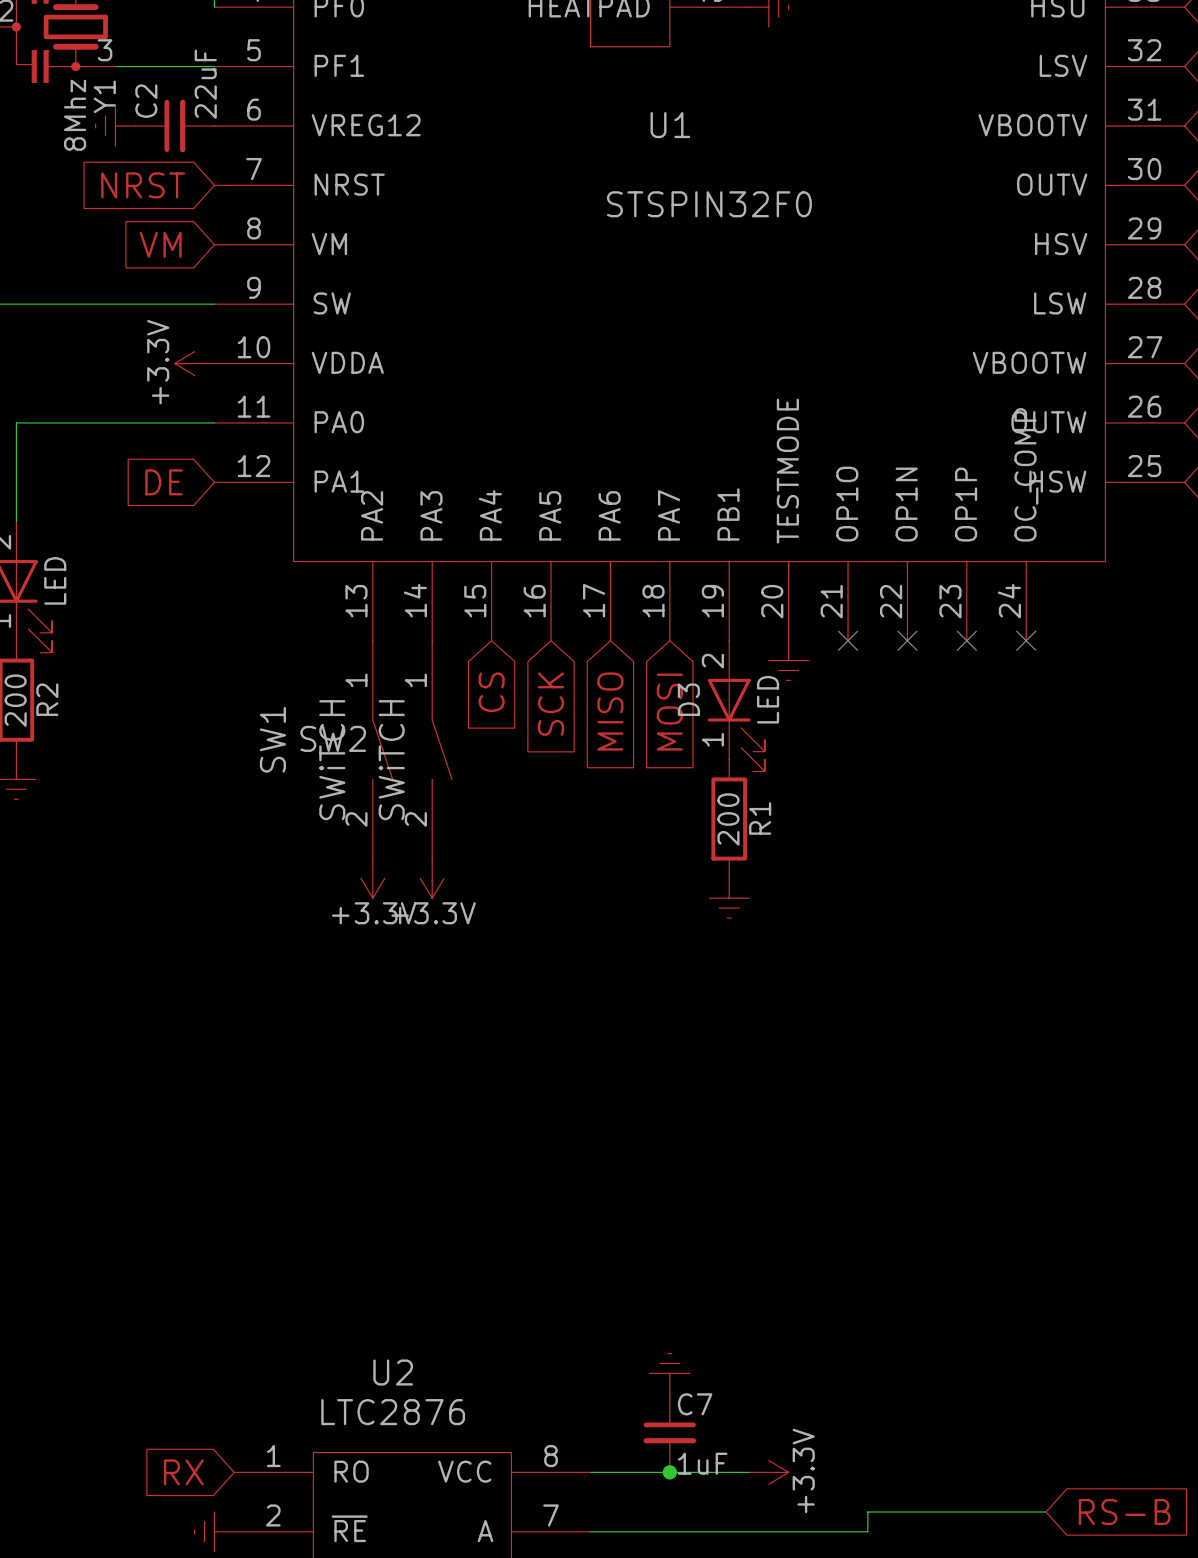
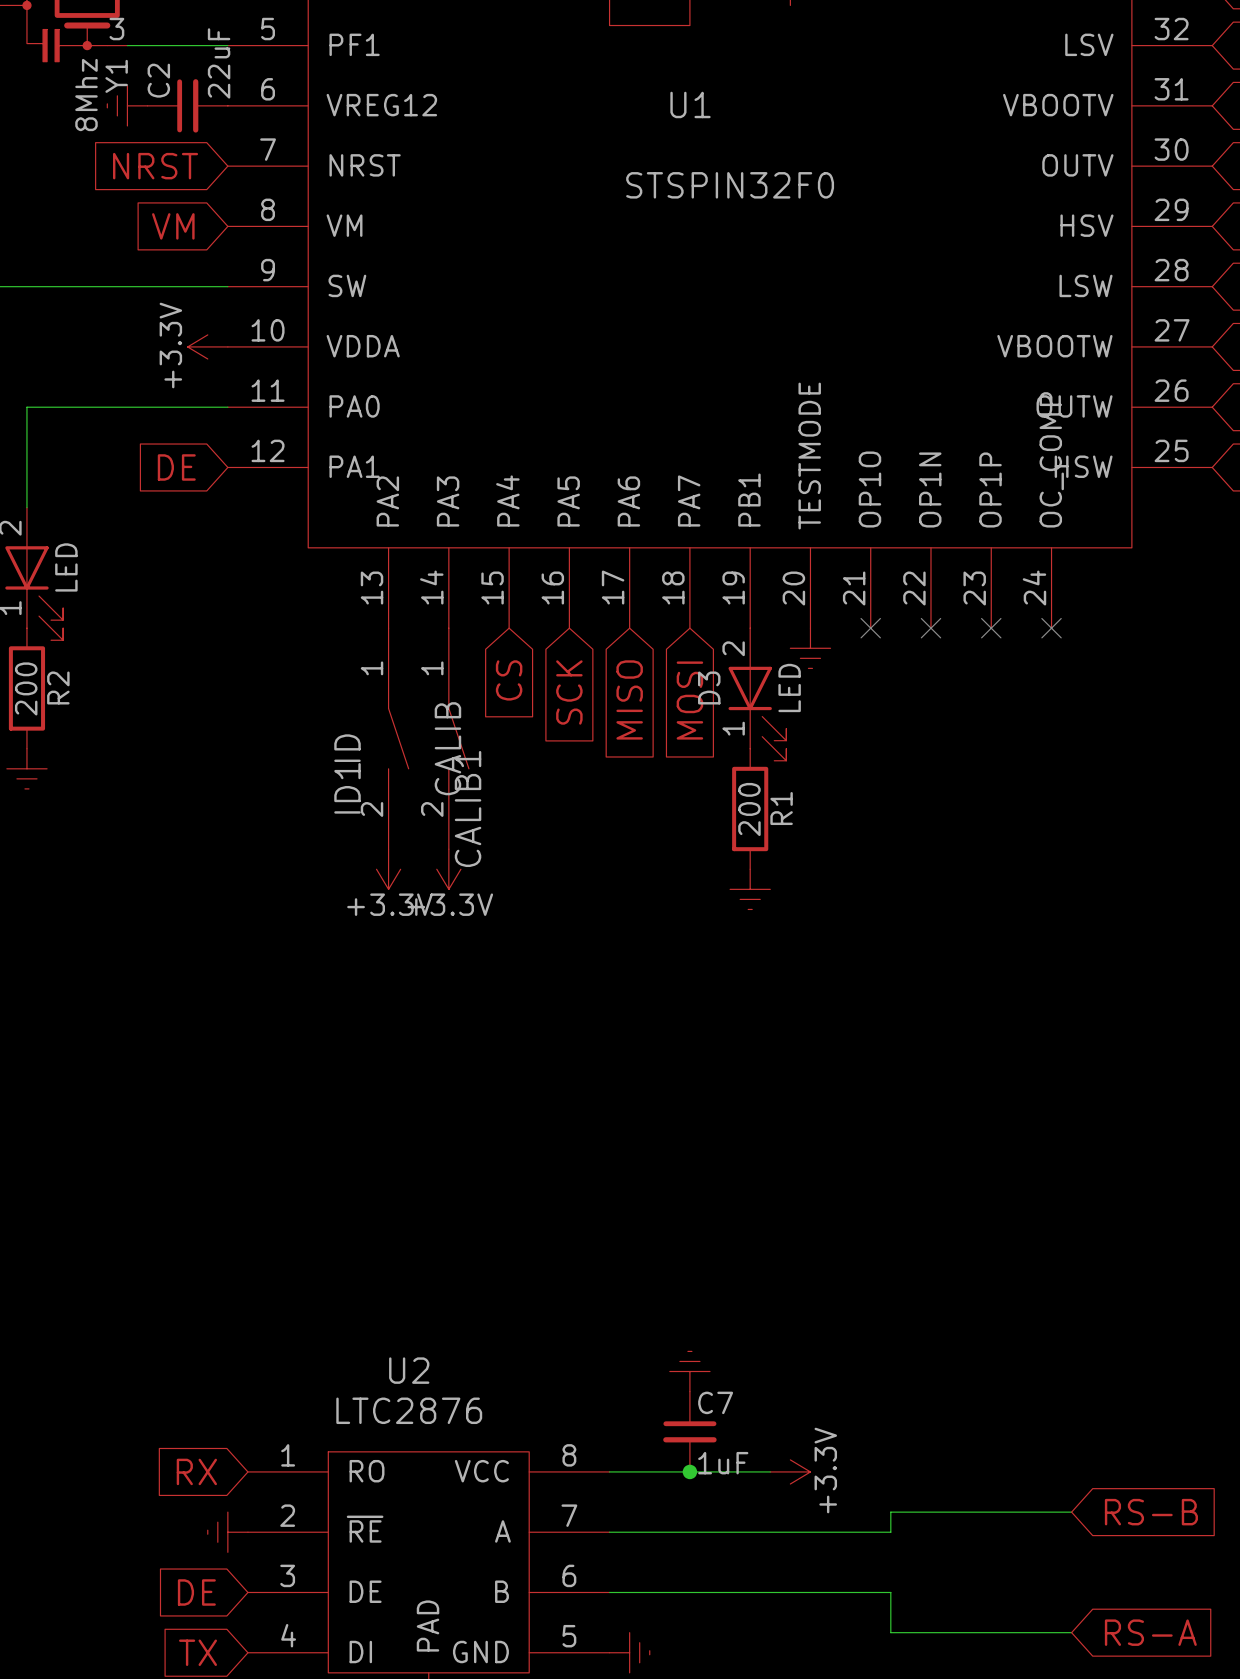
SW2 name: SW2 (333, 738) -> CALIB1 (468, 809)
SW1 name: SW1 (272, 739) -> ID1 (347, 788)
SW1 value: SWiTCH (332, 760) -> ID (347, 748)
SW2 value: SWiTCH (391, 760) -> CALIB (447, 748)

